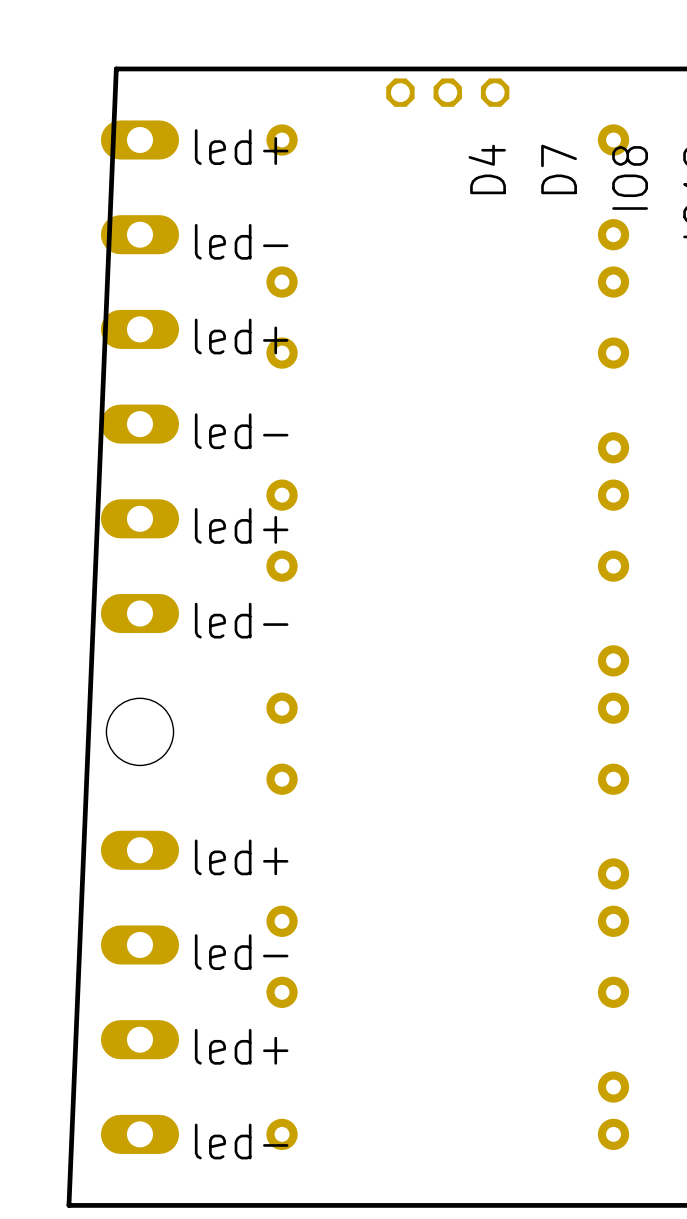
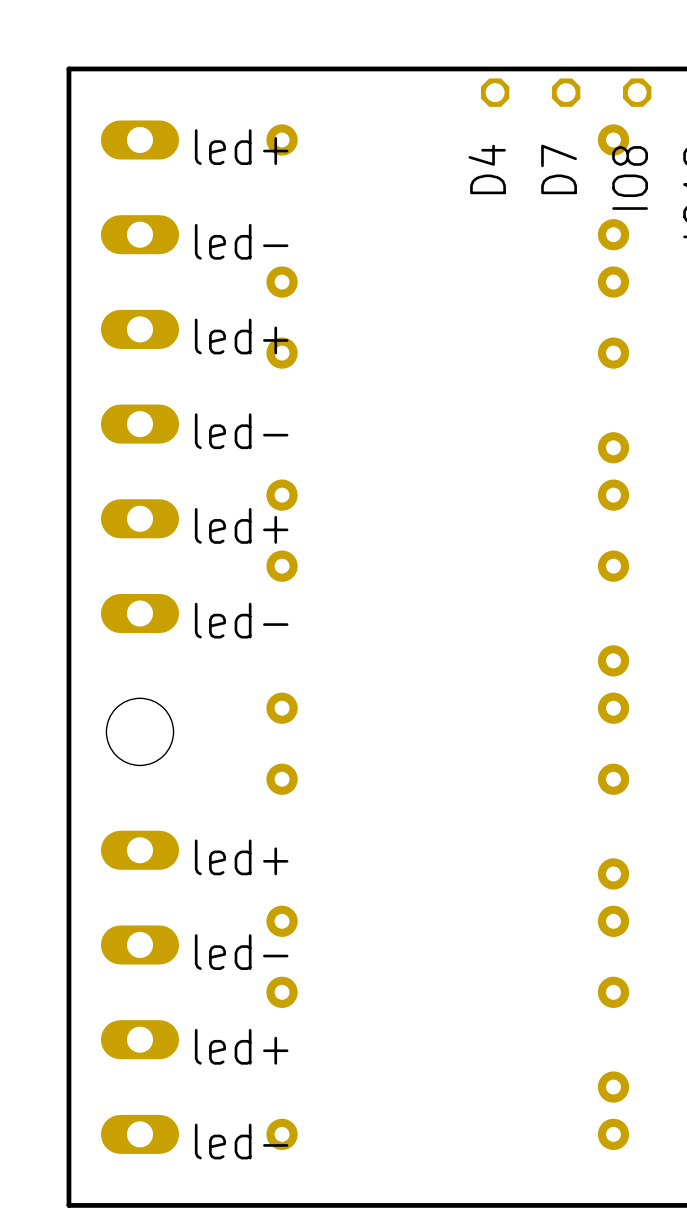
board edge: (116, 68) (68, 1205) -> (116, 68) (68, 68) (68, 1205)
part: (400, 92) -> none
part: (447, 92) -> none
part: none -> (566, 92)
part: none -> (637, 92)

